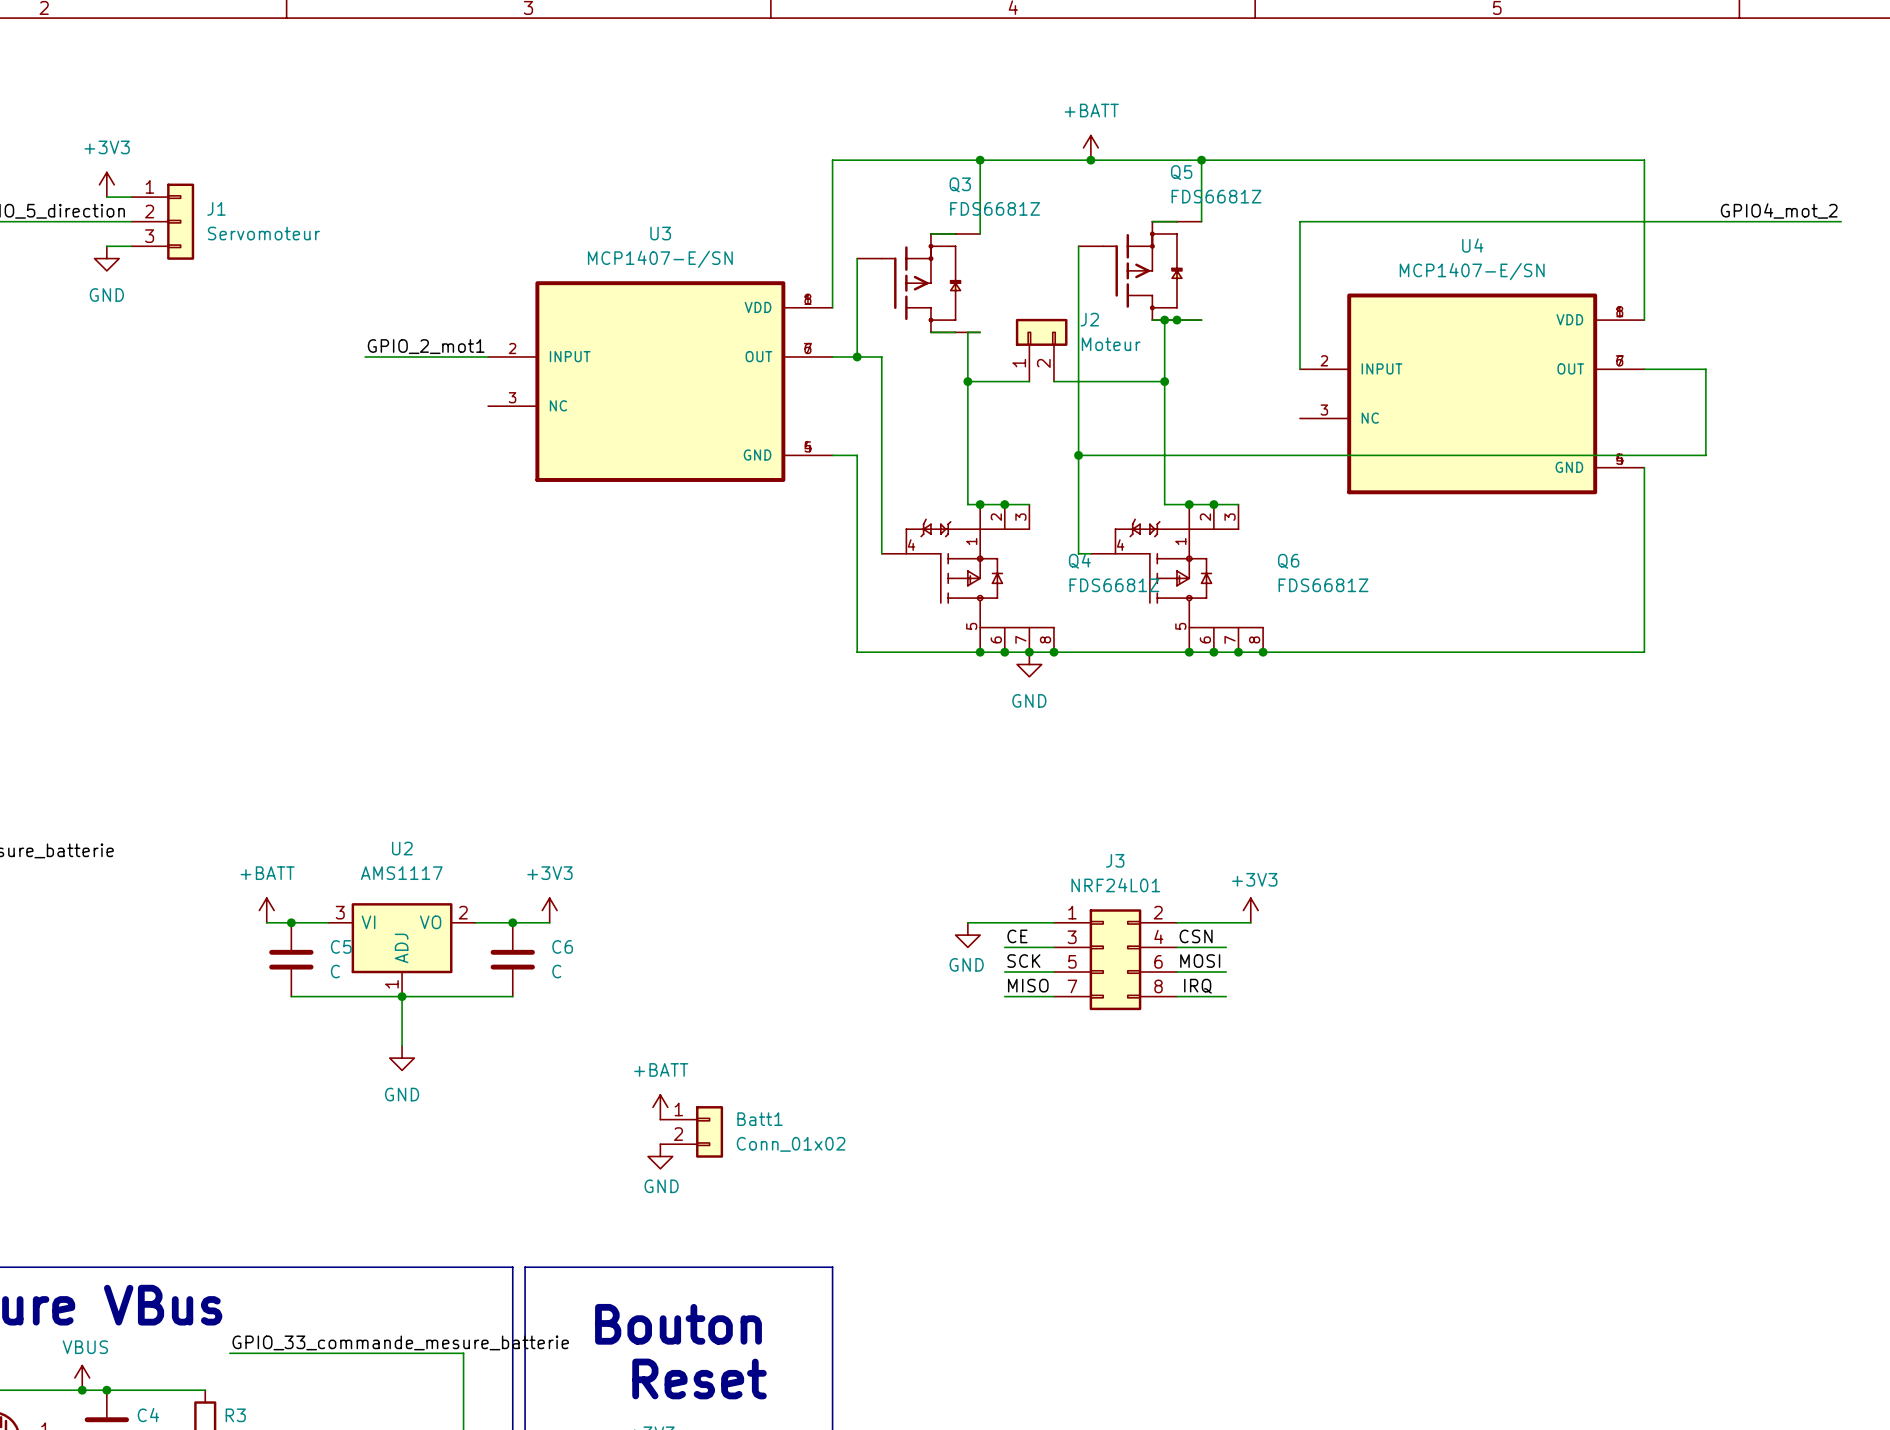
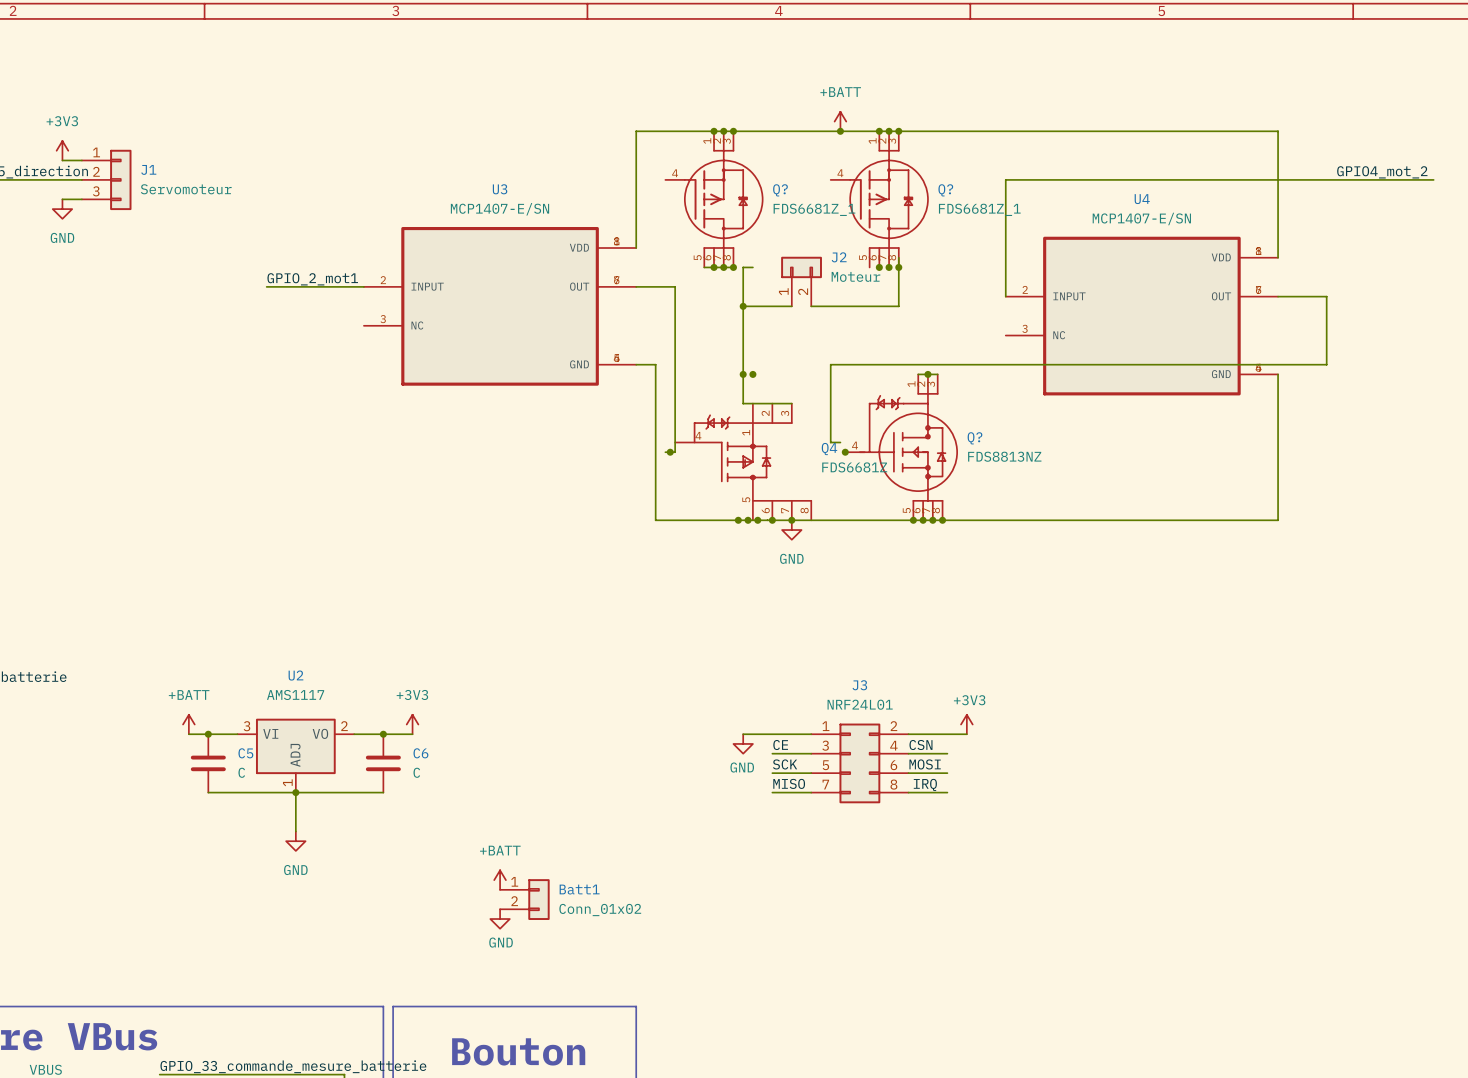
junction: none -> (714, 131)
junction: none -> (723, 131)
junction: none -> (733, 131)
wire: (980, 160) (980, 233) -> none
junction: (980, 160) -> none
junction: none -> (879, 131)
junction: none -> (889, 131)
junction: none -> (898, 131)
wire: (1201, 160) (1201, 221) -> none
junction: (1201, 160) -> none
wire: (1152, 221) (1176, 221) -> none
wire: (930, 233) (955, 233) -> none
Q?: none -> FDS6681Z_1 (714, 199)
wire: (1078, 246) (1078, 455) -> none
Q?: none -> FDS6681Z_1 (879, 199)
wire: (857, 258) (857, 356) -> none
Q5: FDS6681Z (1140, 270) -> none
Q3: FDS6681Z (918, 283) -> none
wire: (1152, 320) (1201, 320) -> none
junction: (1164, 320) -> none
junction: (1176, 320) -> none
wire: none -> (704, 267) (714, 267)
junction: none -> (714, 267)
junction: none -> (723, 267)
junction: none -> (733, 267)
junction: none -> (879, 267)
junction: none -> (889, 267)
junction: none -> (898, 267)
junction: (857, 356) -> none
wire: (1164, 381) (1164, 504) (1238, 504) -> none
junction: (1164, 381) -> none
junction: (1078, 455) -> none
junction: none -> (743, 374)
junction: none -> (752, 374)
wire: none -> (918, 374) (937, 374)
junction: none -> (927, 374)
junction: (980, 504) -> none
junction: (1004, 504) -> none
junction: (1189, 504) -> none
junction: (1213, 504) -> none
wire: none -> (675, 442) (675, 452) (665, 452)
Q?: none -> FDS8813NZ (901, 447)
junction: none -> (670, 452)
junction: none -> (845, 452)
Q6: FDS6681Z (1176, 578) -> none
junction: none -> (738, 520)
junction: none -> (748, 520)
junction: (980, 652) -> none
junction: none -> (757, 520)
junction: (1053, 652) -> none
junction: none -> (913, 520)
junction: (1189, 652) -> none
junction: none -> (923, 520)
junction: none -> (932, 520)
junction: (1213, 652) -> none
junction: none -> (942, 520)
junction: (1238, 652) -> none
junction: (1263, 652) -> none

